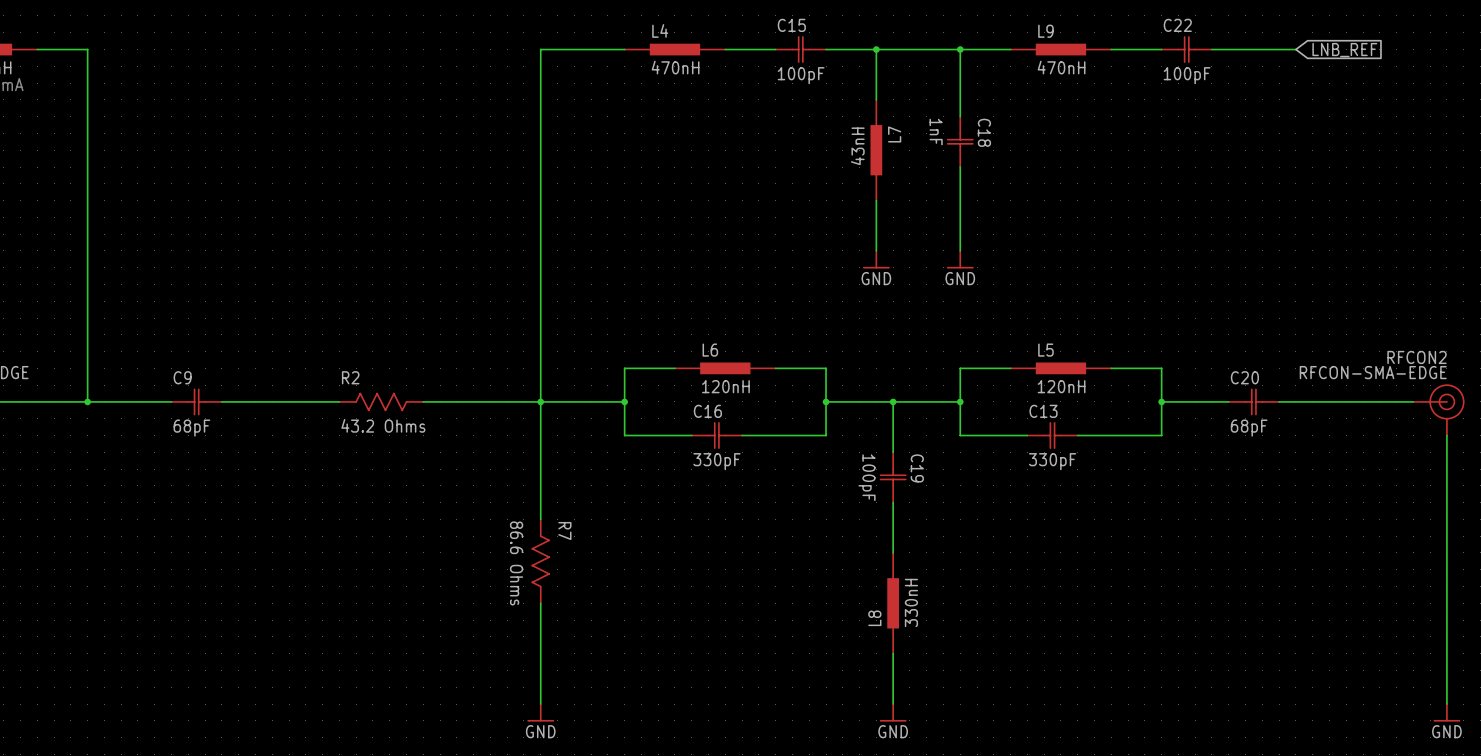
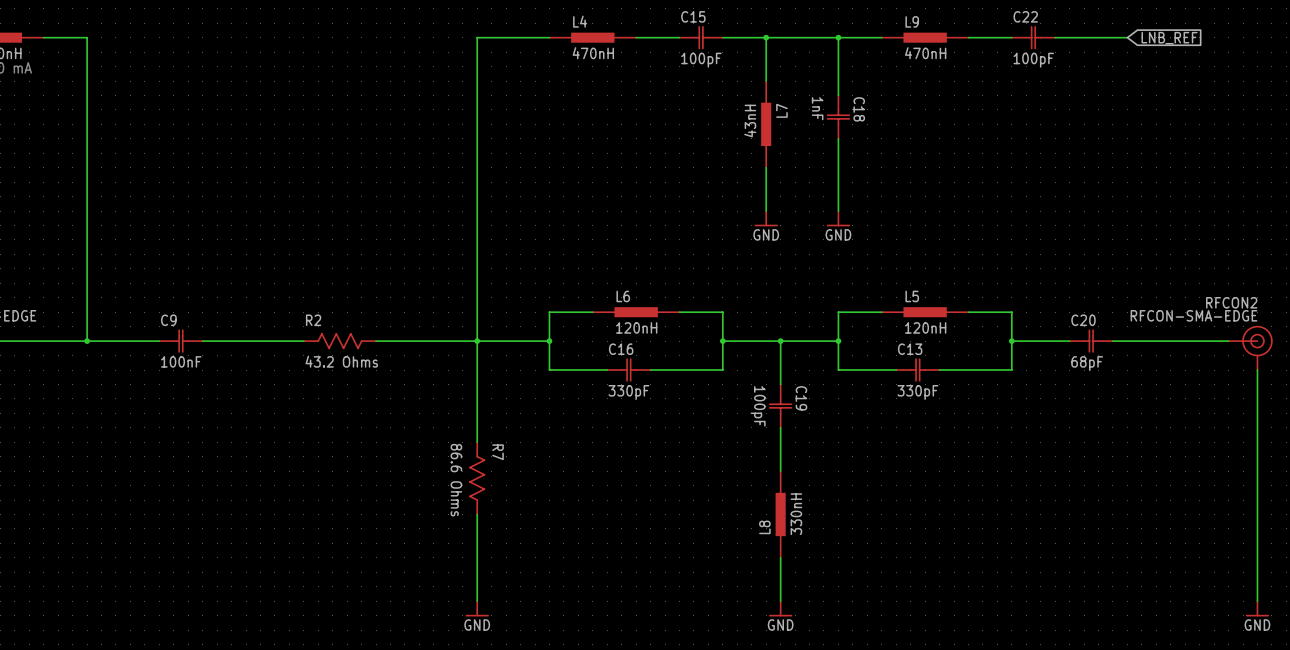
C9 value: 68pF (191, 428) -> 100nF (181, 361)

